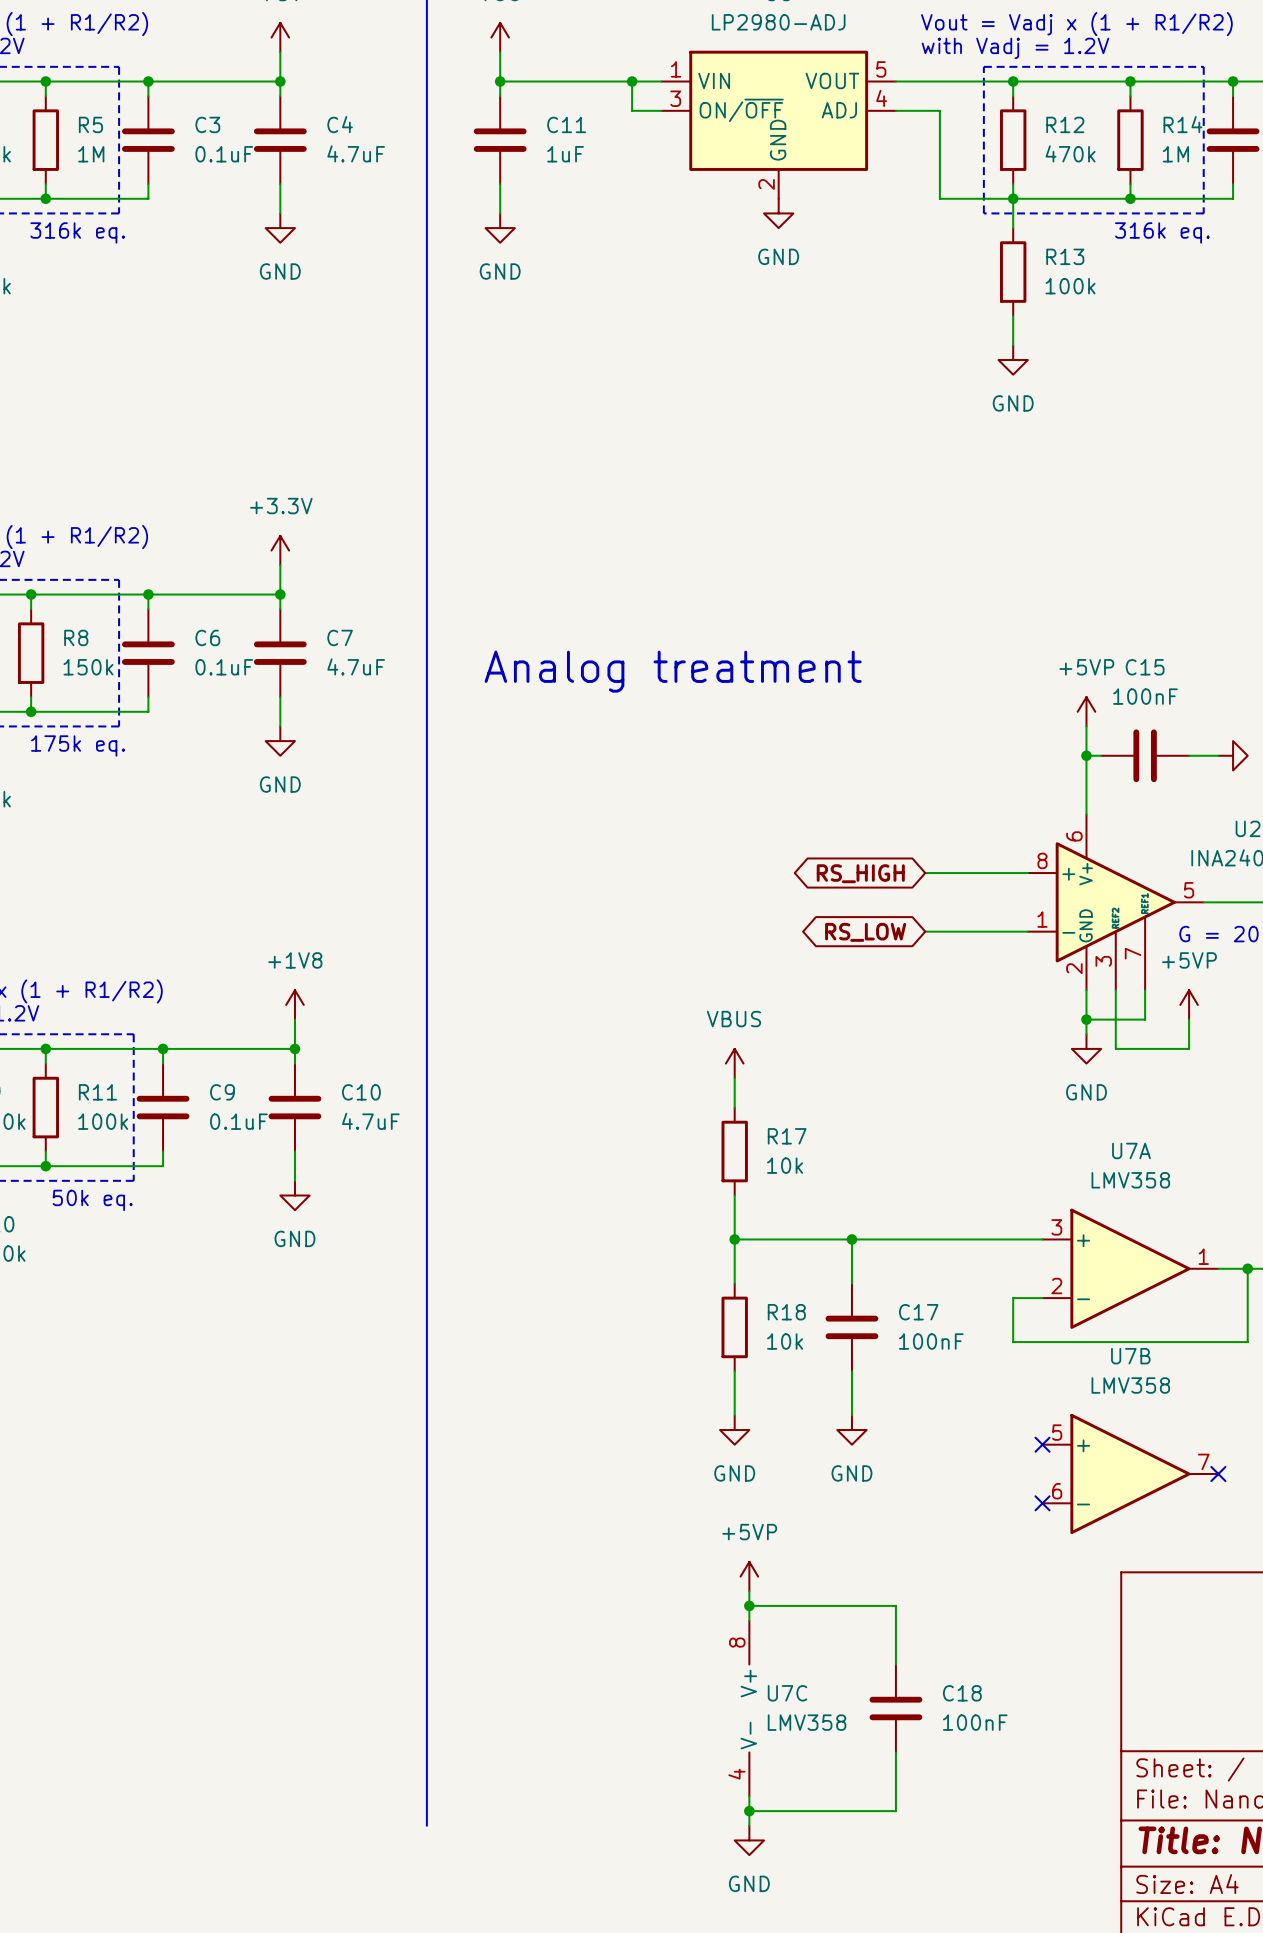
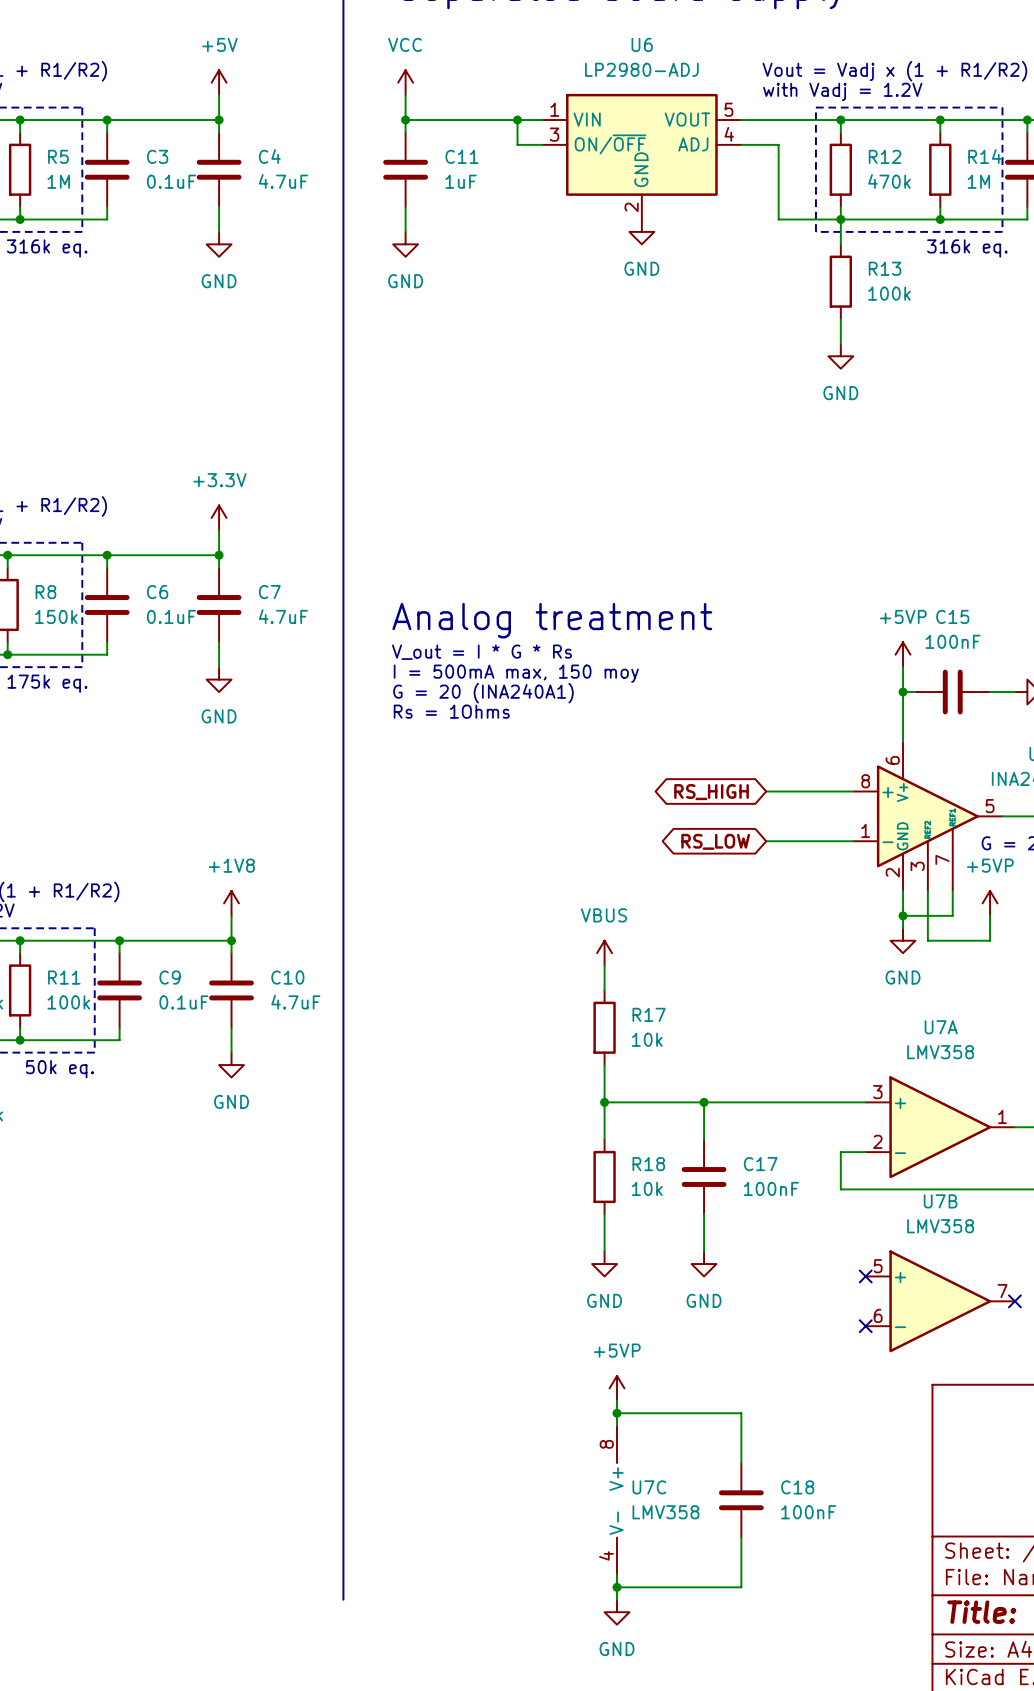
text: none -> V_out = I * G * Rs (481, 652)
text: none -> I = 500mA max, 150 moy (516, 673)
text: none -> G = 20 (INA240A1) (483, 693)
text: none -> Rs = 1Ohms (451, 711)

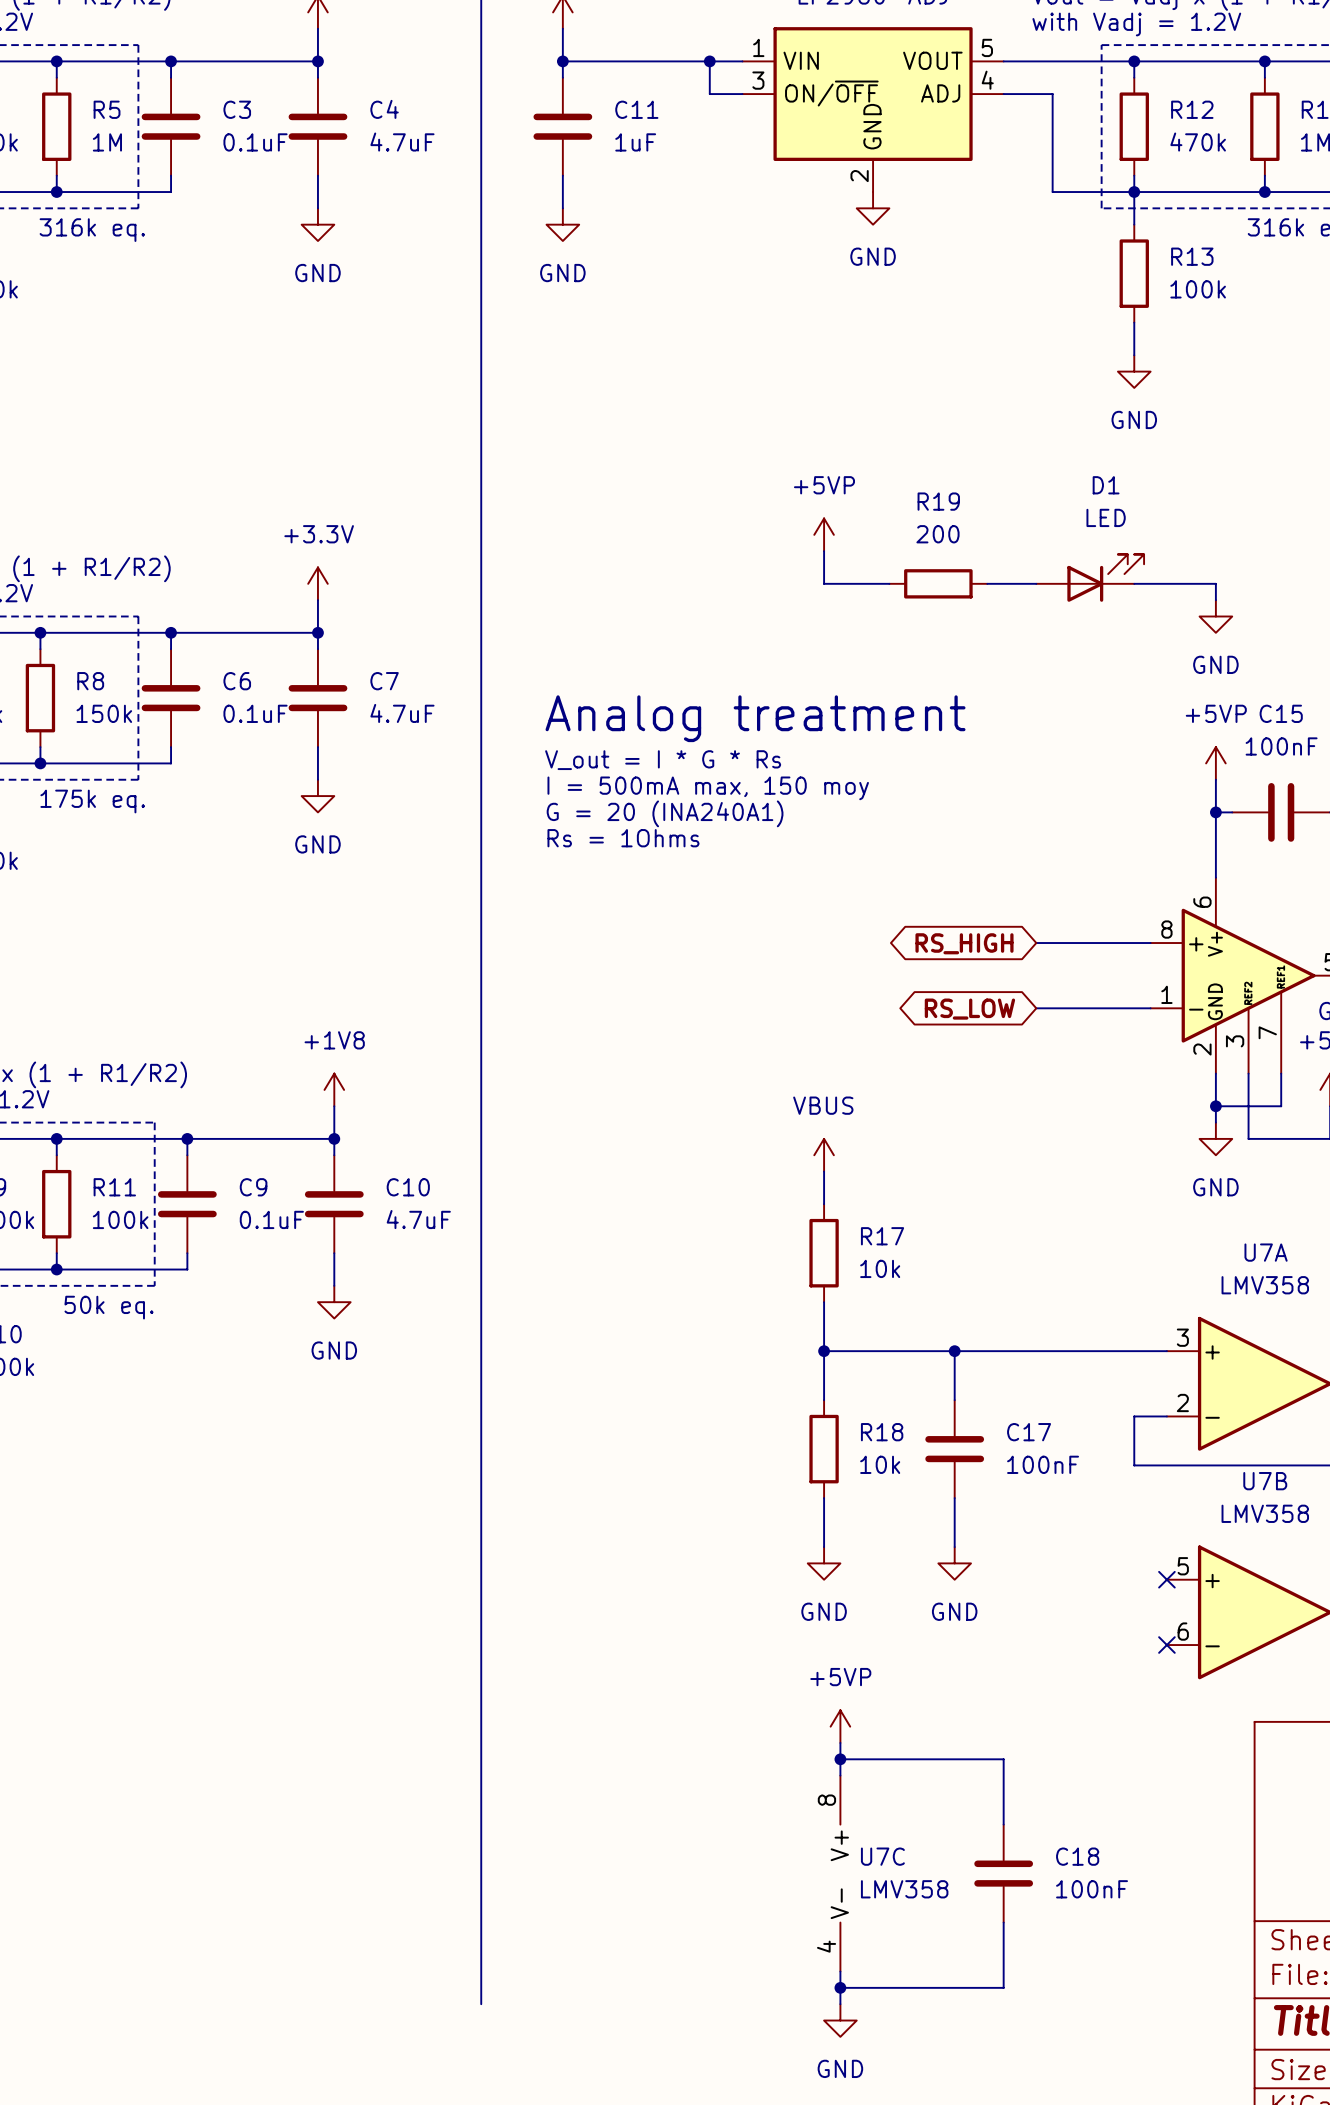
power symbol: none -> +5VP (824, 534)
wire: none -> (824, 551) (824, 583) (889, 583)
D1: none -> LED (1090, 578)
R19: none -> 200 (938, 583)
wire: none -> (987, 583) (1036, 583)
wire: none -> (1134, 583) (1215, 583) (1215, 600)
power symbol: none -> GND (1215, 616)

